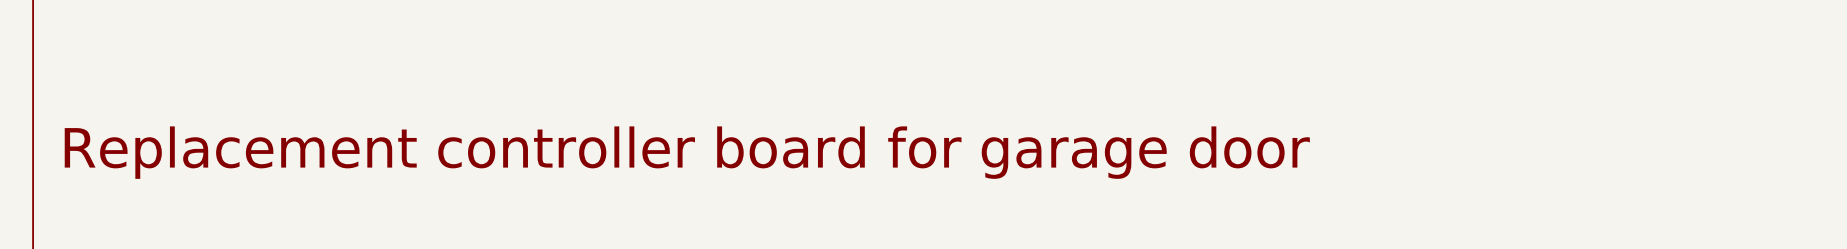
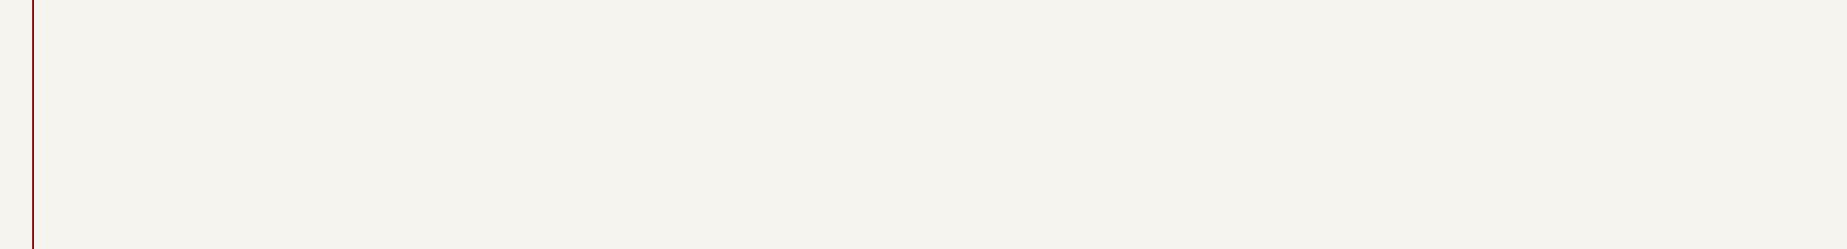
title block: Replacement controller board for garage door (687, 152) -> none

